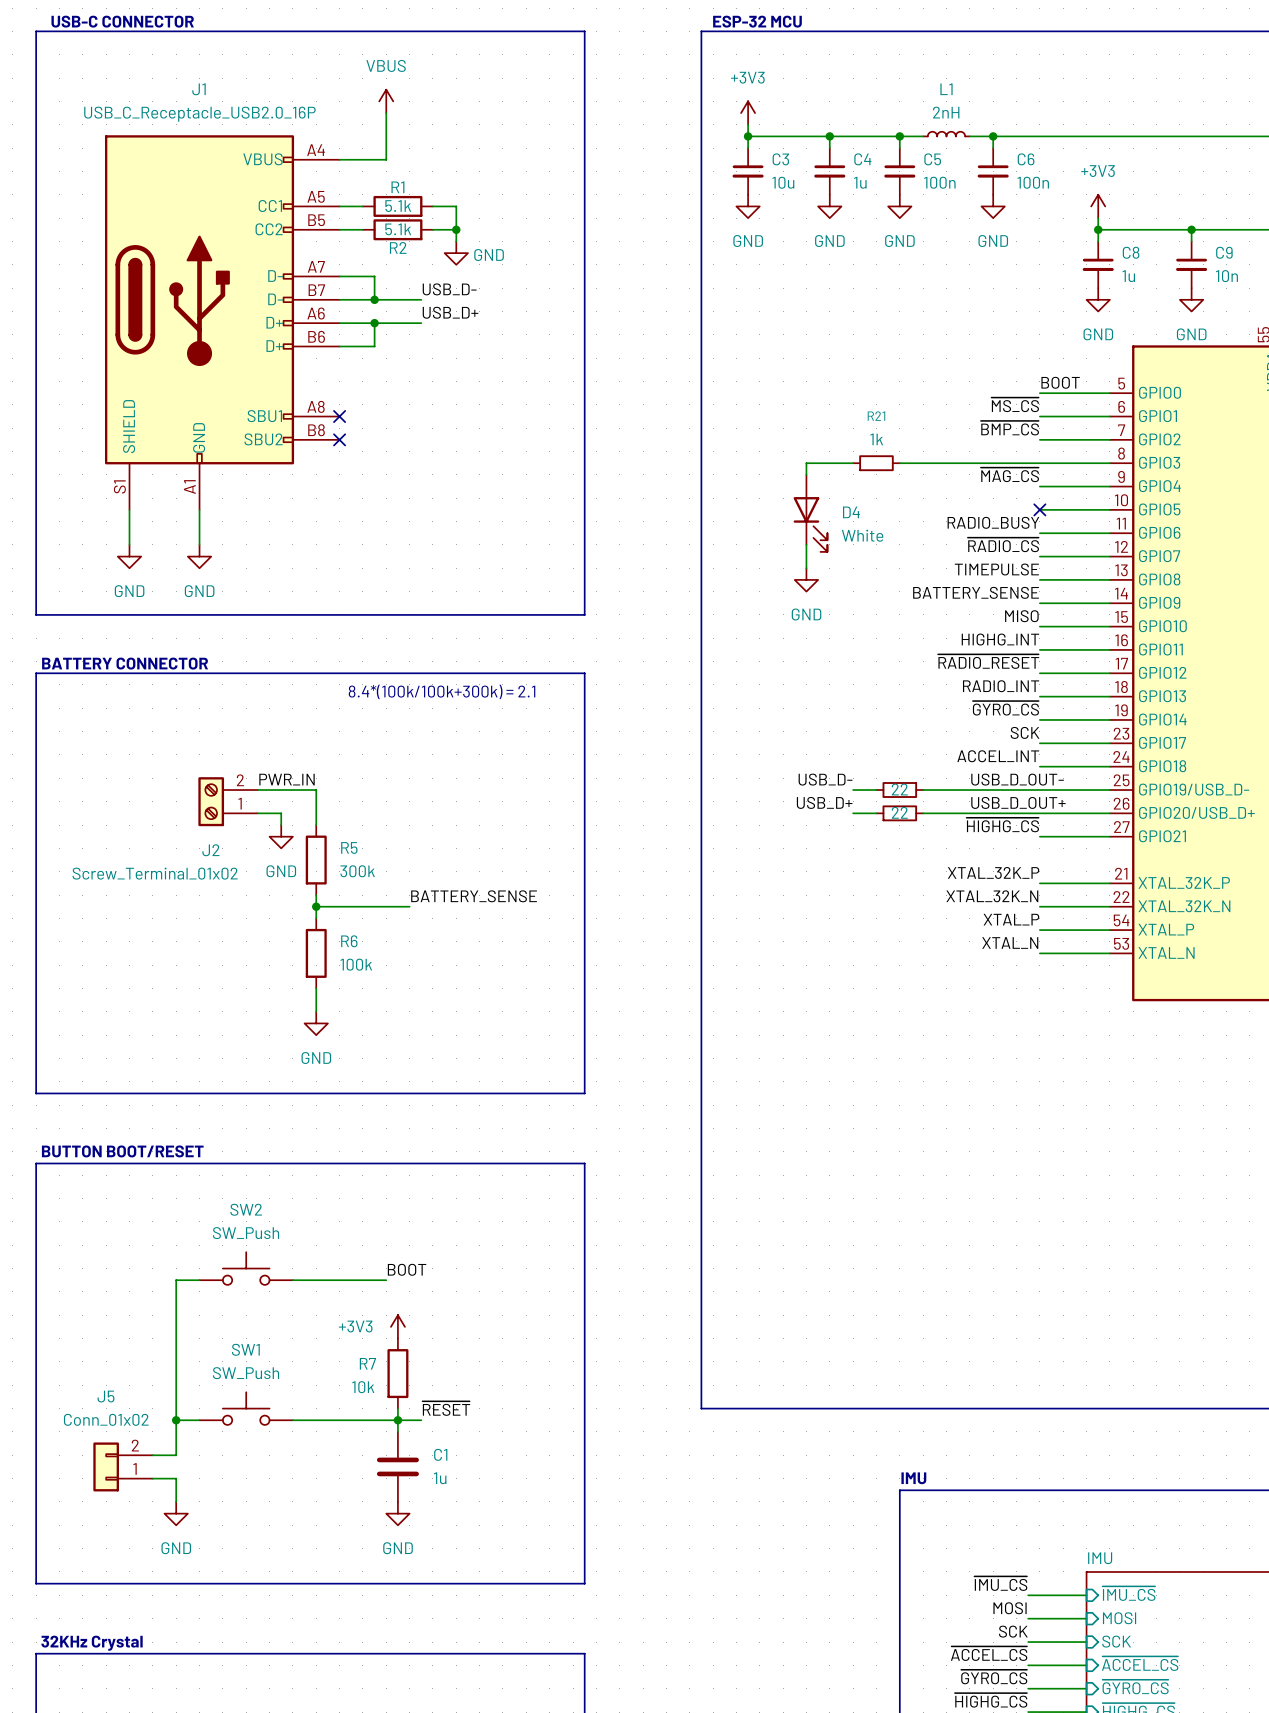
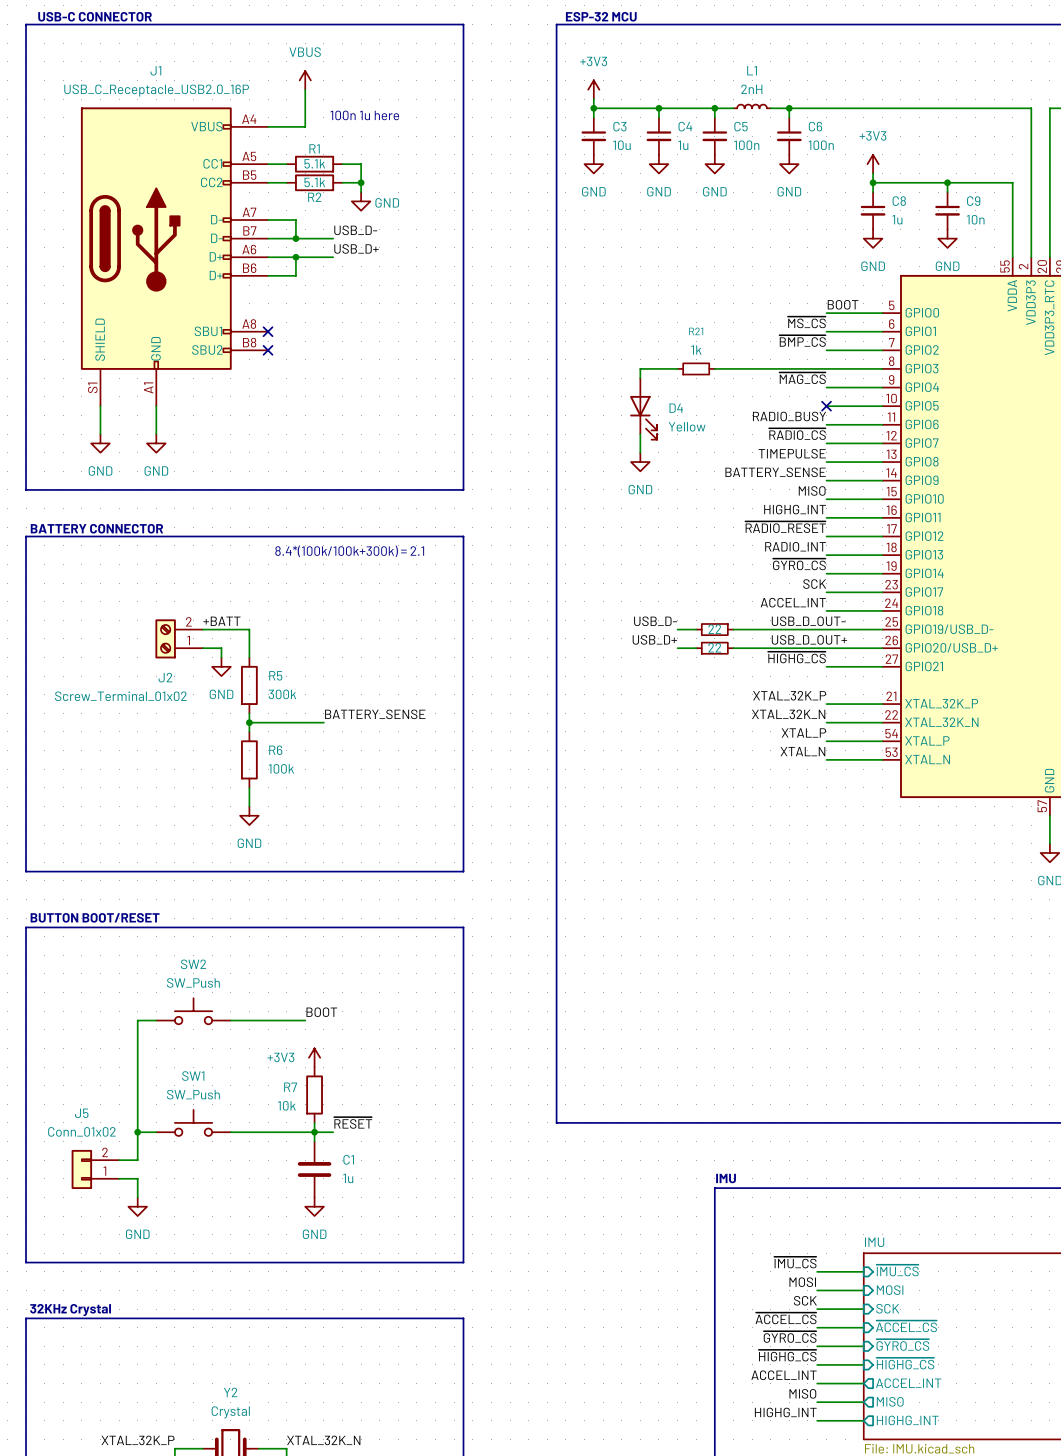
text: none -> 100n 1u here (364, 115)
D4 value: White (862, 535) -> Yellow (687, 426)
label: PWR_IN (287, 779) -> +BATT (221, 621)

